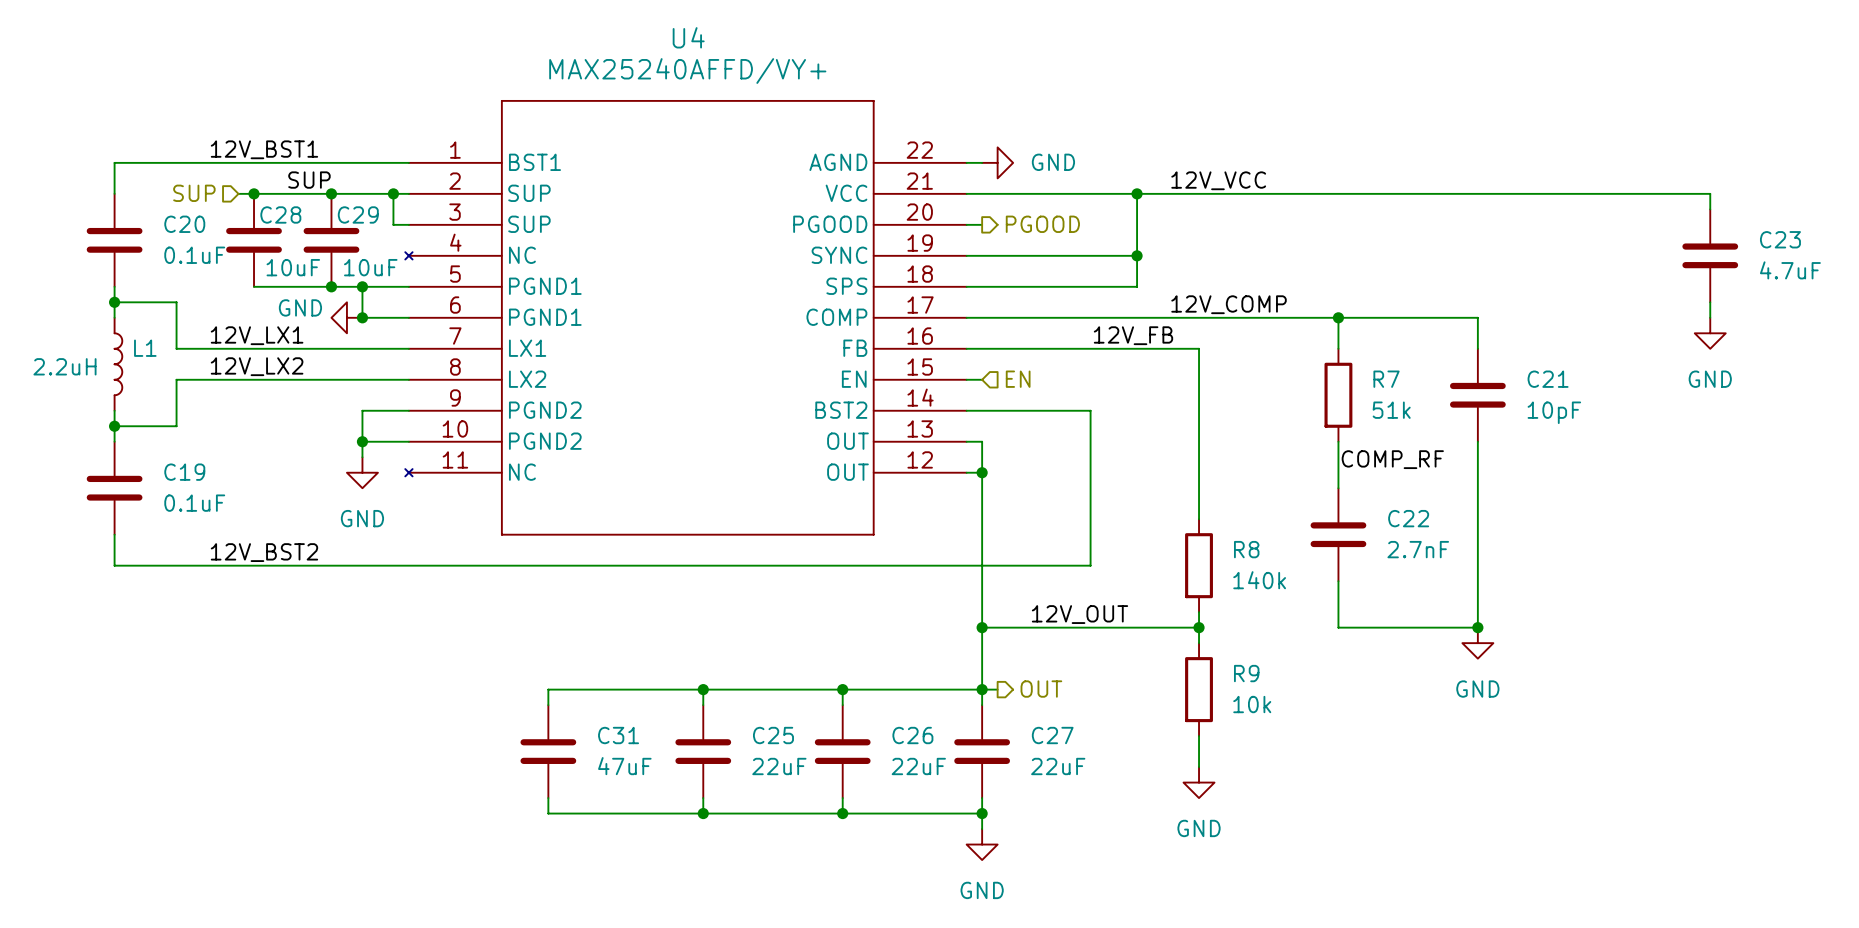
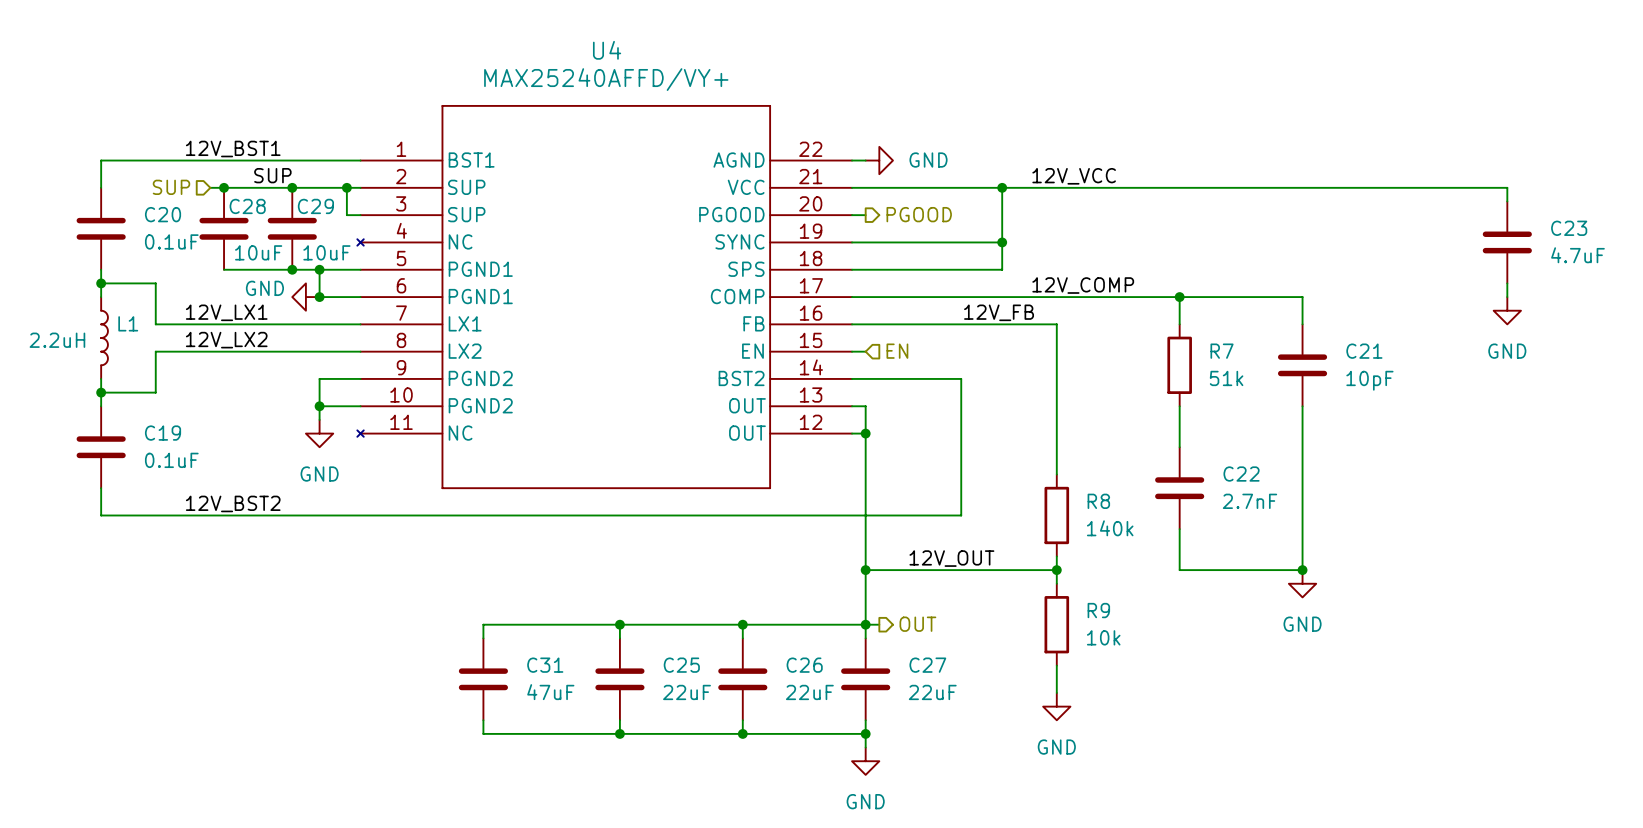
label: COMP_RF (1392, 459) -> none

